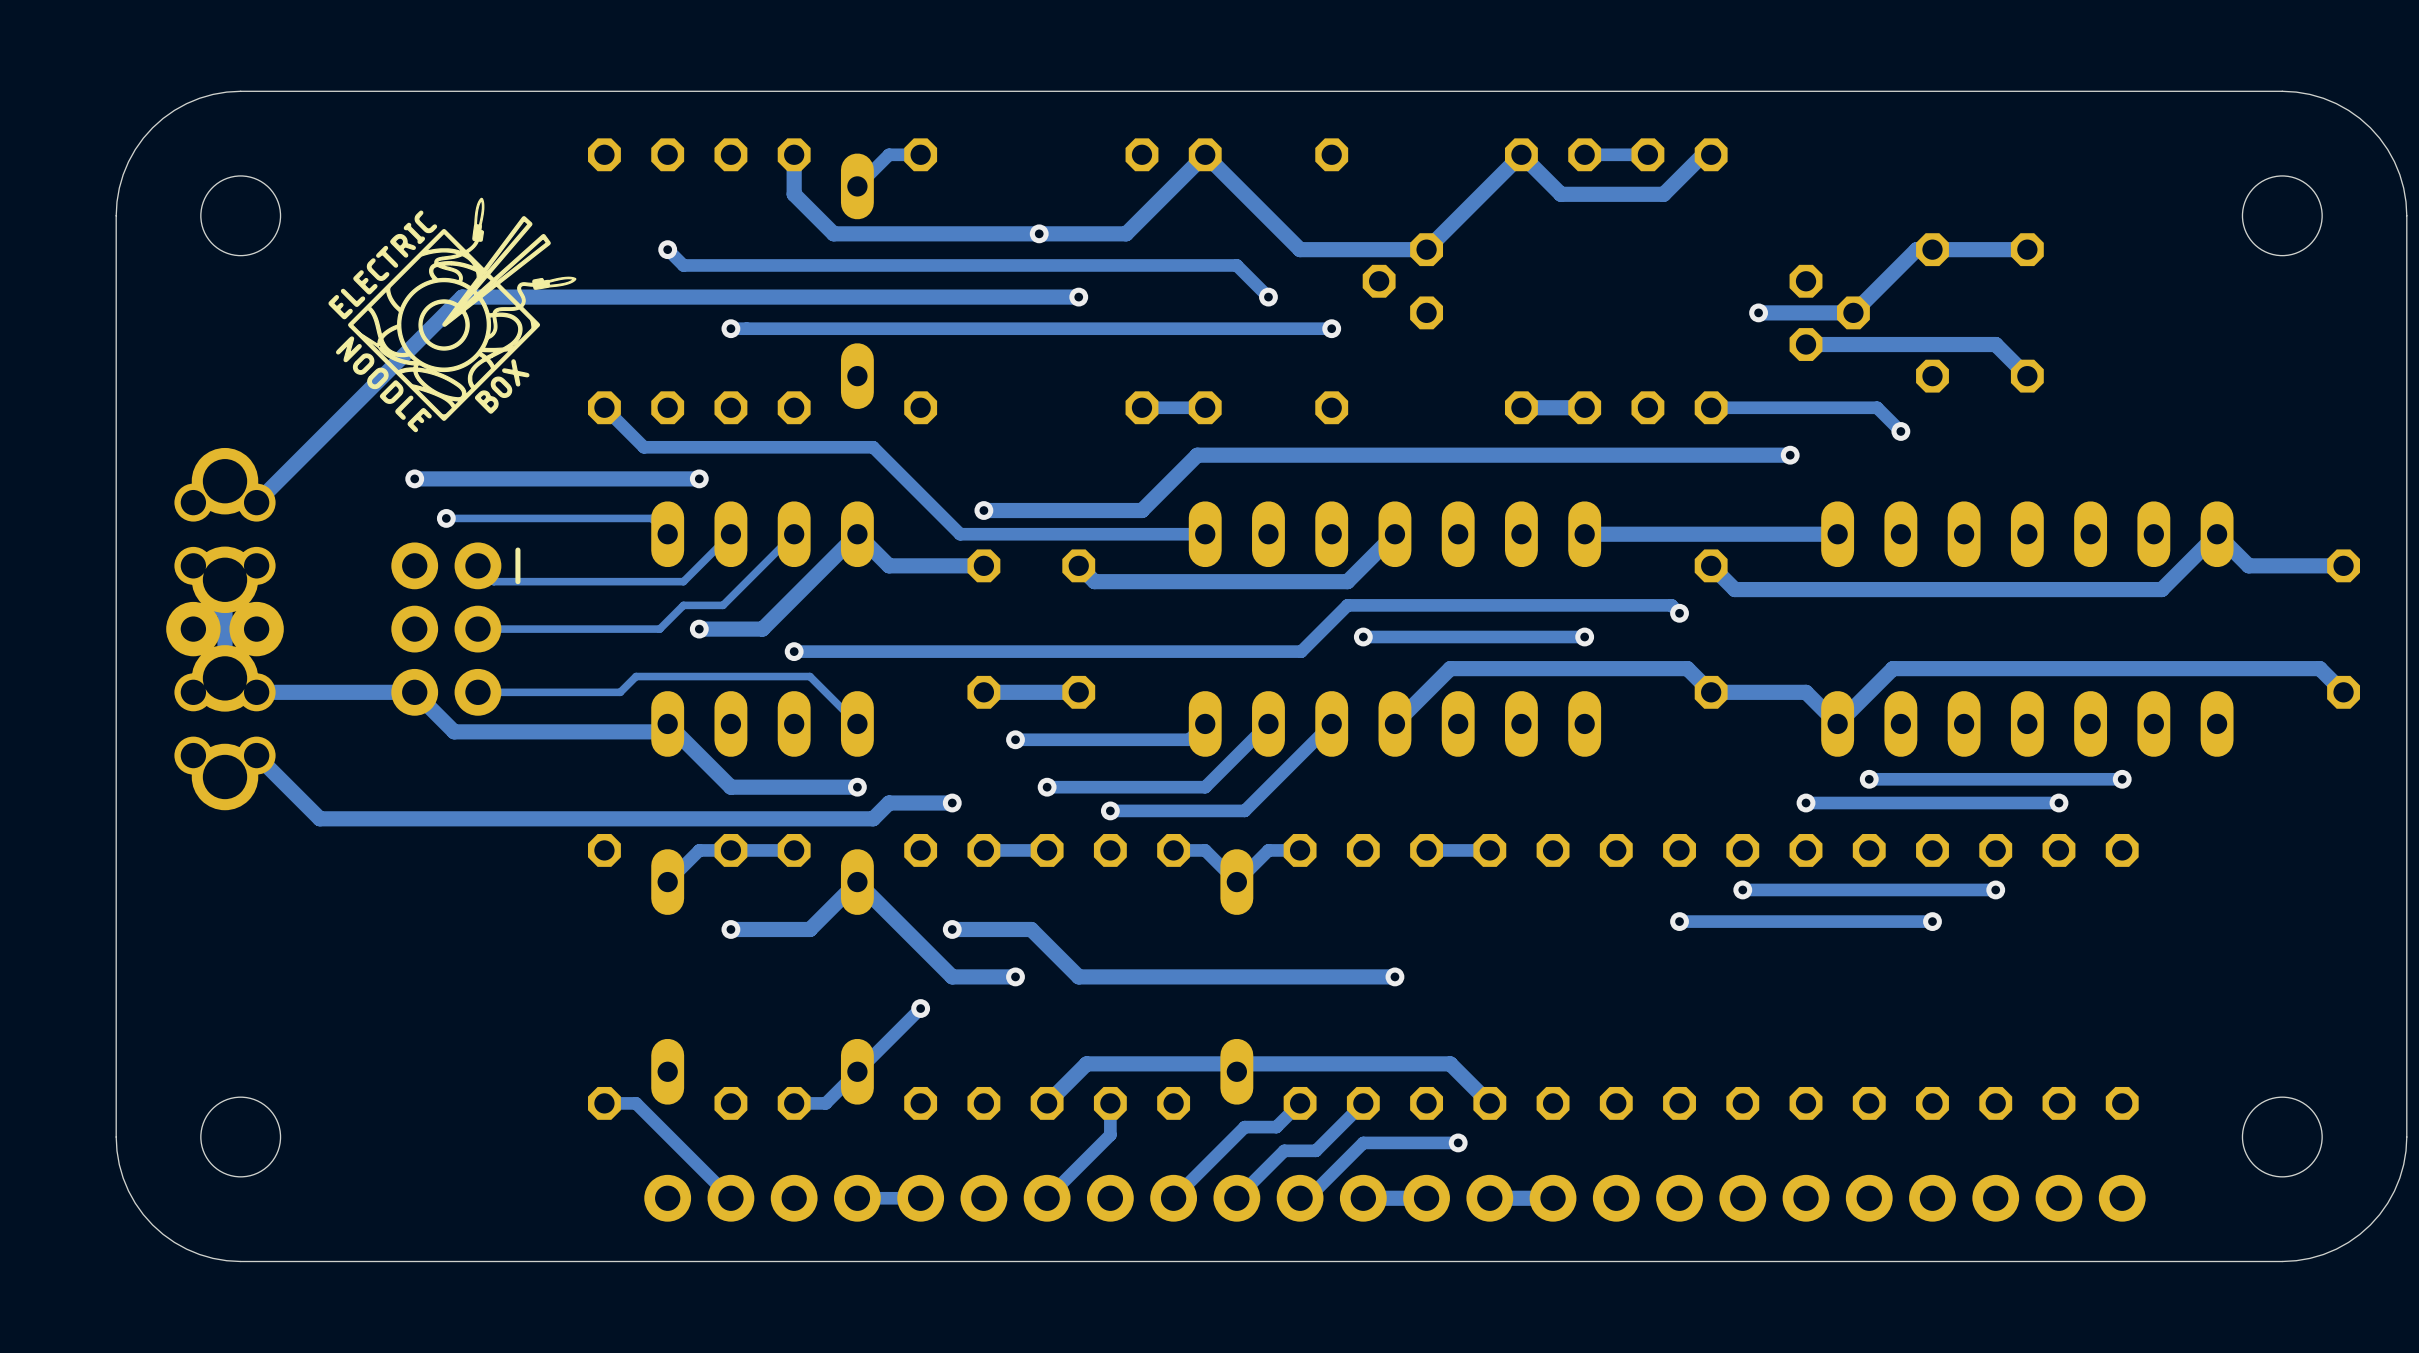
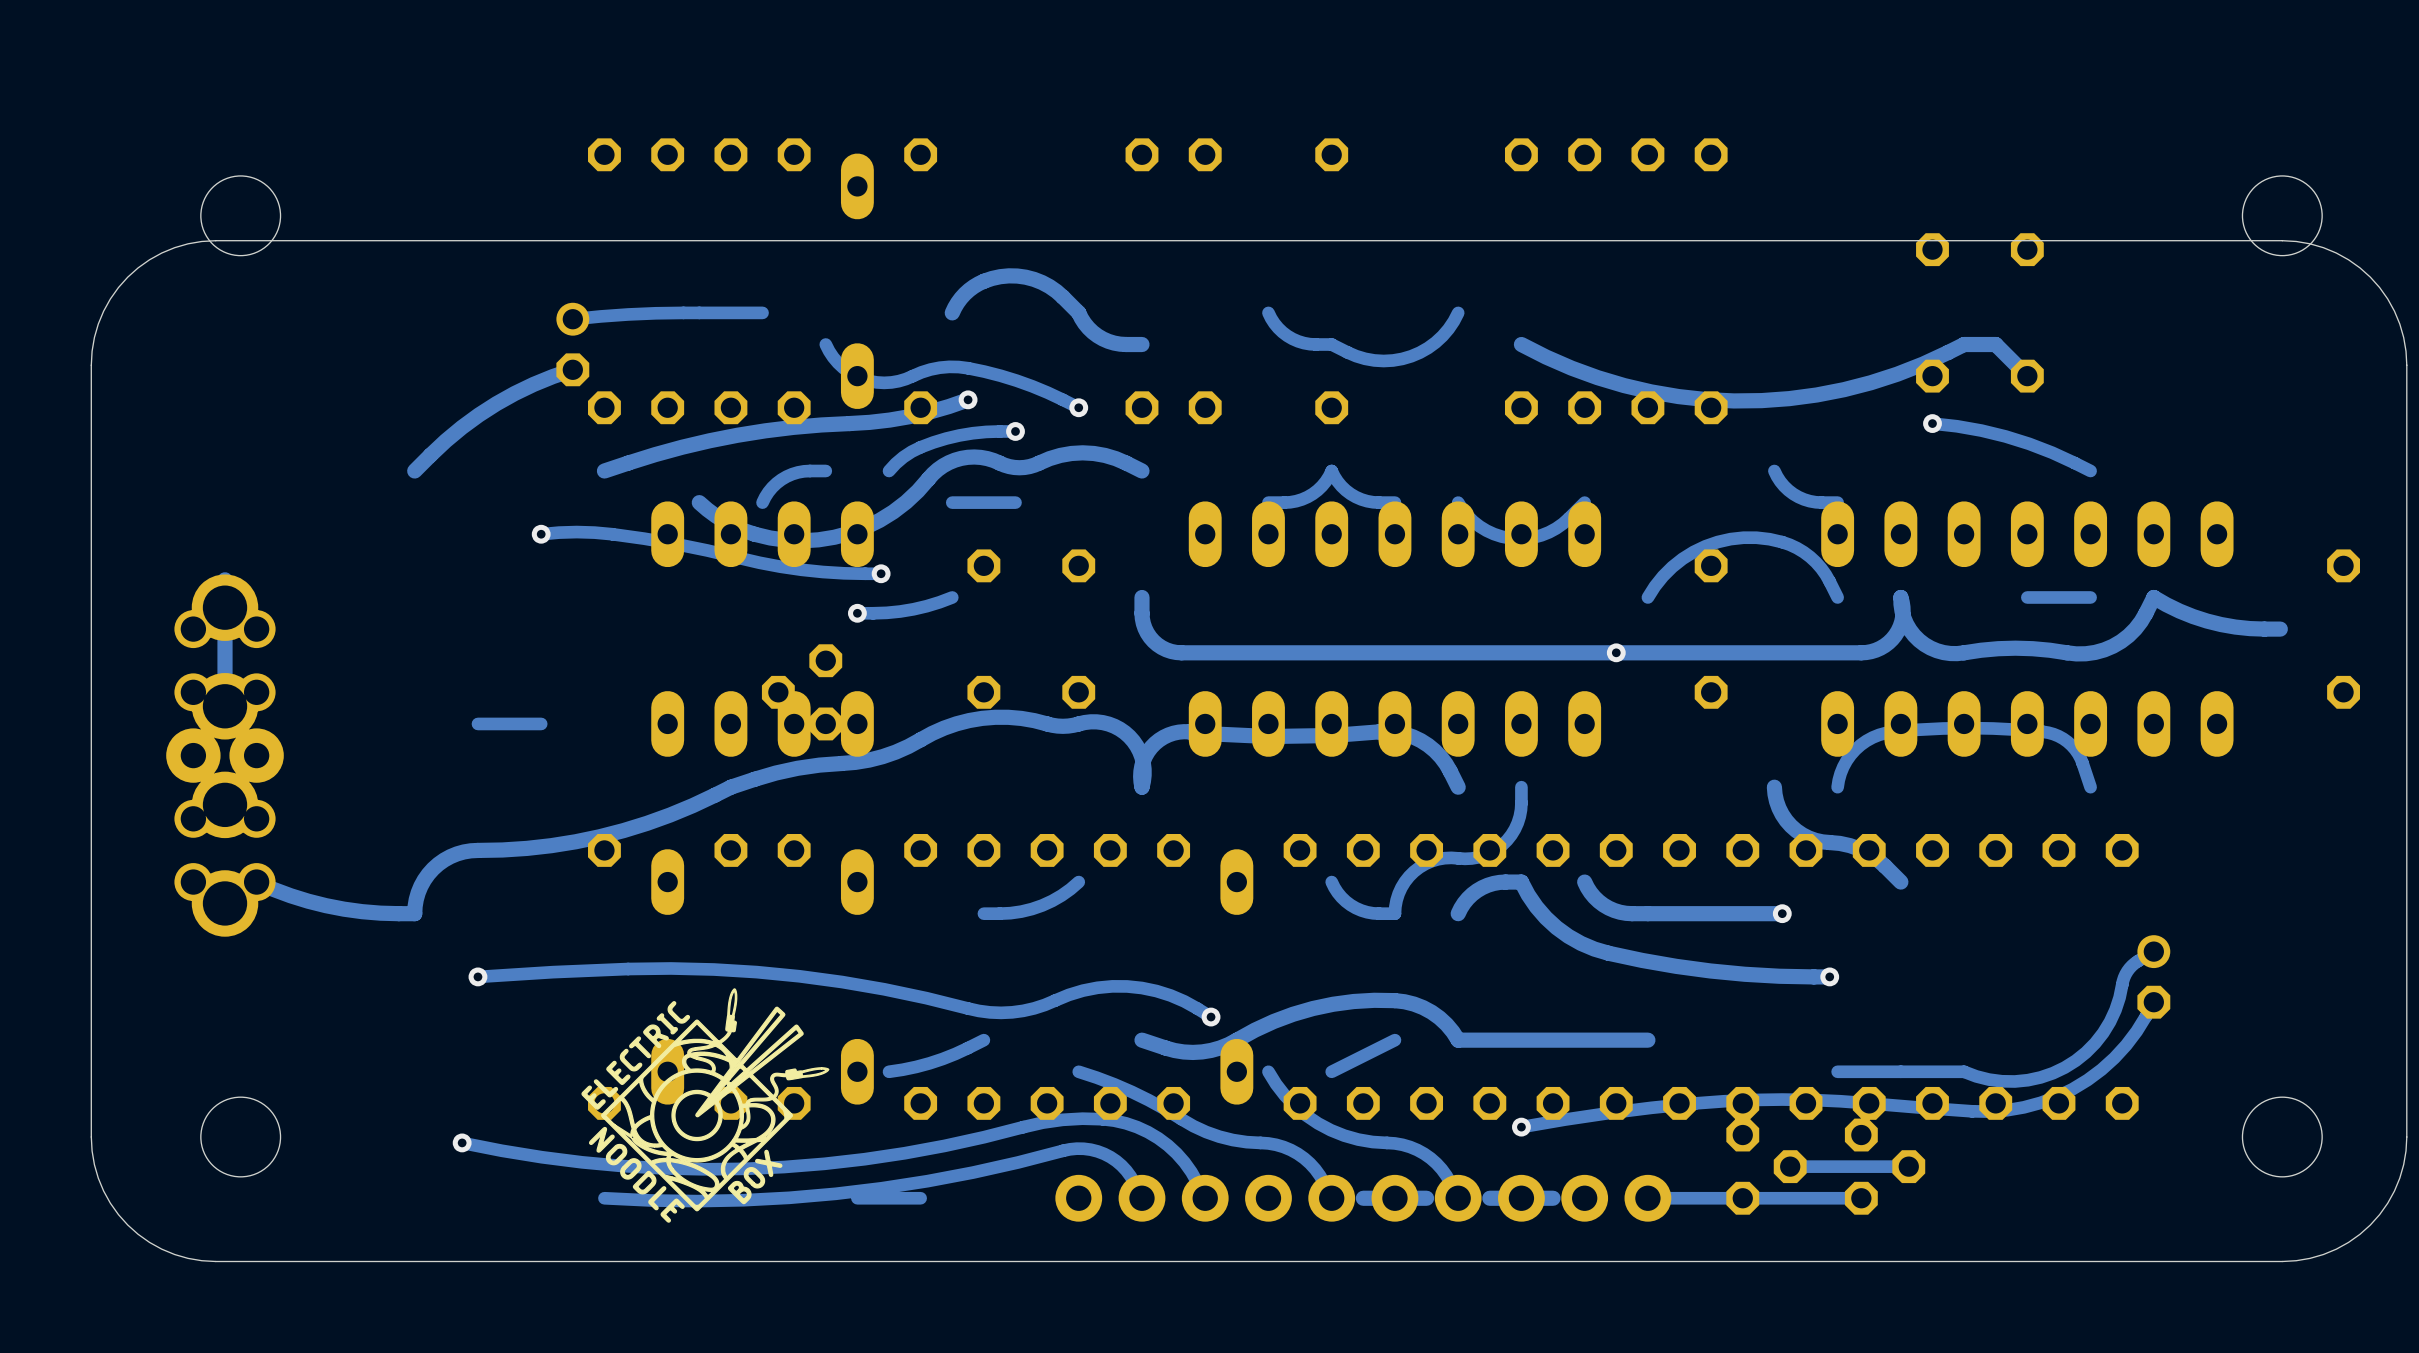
track: (920, 154) (889, 154) (857, 186) -> none
track: (1647, 154) (1584, 154) -> none
track: (1711, 154) (1703, 154) (1663, 194) (1560, 194) (1521, 154) (1426, 249) (1300, 249) (1205, 154) (1126, 233) (833, 233) (794, 194) (794, 154) -> none
drawing: [328, 197, 577, 433] -> none
via: (1039, 233) -> none
track: (667, 249) (683, 265) (1236, 265) (1268, 297) -> none
via: (667, 249) -> none
track: (2027, 249) (1916, 249) (1853, 312) (1758, 312) -> none
part: (1402, 281) -> none
track: (1078, 297) (462, 297) (256, 502) (235, 481) (225, 481) (203, 502) (193, 502) -> none
via: (1078, 297) -> none
via: (1268, 297) -> none
track: none -> (762, 312) (655, 313) (572, 319)
track: none -> (952, 312) (961, 298) (978, 283) (1000, 276) (1025, 277) (1042, 282) (1056, 291) (1078, 312) (1088, 328) (1102, 338) (1120, 344) (1141, 344)
track: none -> (1458, 312) (1442, 336) (1428, 347) (1411, 356) (1383, 361) (1356, 356) (1331, 344) (1309, 344) (1298, 341) (1278, 328) (1268, 312)
via: (1758, 312) -> none
part: (1829, 312) -> none
via: (730, 328) -> none
track: (1331, 328) (730, 328) -> none
via: (1331, 328) -> none
part: none -> (572, 344)
track: none -> (825, 344) (833, 357) (843, 368) (855, 376) (869, 381) (884, 382) (898, 381) (939, 367) (968, 368) (1016, 380) (1078, 407)
track: (1964, 344) (1806, 344) -> (1964, 344) (1897, 374) (1844, 389) (1789, 398) (1733, 400) (1678, 396) (1624, 385) (1571, 368) (1521, 344)
board edge: (2406, 365) (2406, 215) (2406, 201) (2399, 174) (2387, 149) (2379, 138) (2359, 118) (2348, 110) (2323, 98) (2296, 92) (240, 91) (226, 92) (199, 98) (174, 110) (163, 118) (143, 138) (135, 149) (123, 174) (116, 201) (116, 1137) (116, 1150) (123, 1178) (135, 1203) (152, 1225) (174, 1242) (199, 1254) (226, 1260) (240, 1261) -> (2406, 365) (2406, 351) (2399, 324) (2387, 298) (2370, 277) (2348, 259) (2323, 247) (2296, 241) (2282, 240) (215, 240) (201, 241) (174, 247) (149, 259) (138, 267) (118, 287) (110, 298) (98, 324) (92, 351) (92, 1150) (98, 1178) (110, 1203) (118, 1214) (138, 1234) (161, 1249) (188, 1258) (201, 1260) (240, 1261)
track: none -> (572, 369) (533, 384) (496, 403) (461, 427) (414, 470)
track: none -> (968, 399) (929, 412) (889, 420) (793, 427) (737, 435) (682, 447) (604, 470)
via: none -> (968, 399)
track: (604, 407) (643, 447) (873, 447) (960, 534) (1205, 534) -> none
via: none -> (1078, 407)
track: (1205, 407) (1141, 407) -> (1015, 502) (952, 502)
track: (1584, 407) (1521, 407) -> (2090, 597) (2027, 597)
track: (1711, 407) (1877, 407) (1900, 431) -> none
track: none -> (1932, 423) (1957, 426) (2005, 436) (2052, 452) (2090, 470)
track: none -> (1015, 431) (972, 433) (933, 442) (911, 451) (889, 470)
via: none -> (1015, 431)
via position: (1900, 431) -> (1932, 423)
track: (1790, 455) (1197, 455) (1141, 510) (983, 510) -> none
via: (1790, 455) -> none
track: none -> (825, 470) (803, 471) (786, 476) (772, 487) (762, 502)
track: none -> (1141, 470) (1115, 458) (1093, 453) (1060, 455) (1034, 465) (1019, 467) (980, 457) (961, 458) (937, 469) (906, 502) (879, 520) (850, 533) (818, 539) (786, 540) (754, 534) (725, 521) (699, 502)
track: none -> (1774, 470) (1784, 486) (1798, 497) (1815, 502) (1837, 502)
via: (414, 478) -> none
track: (699, 478) (414, 478) -> none
via: (699, 478) -> none
track: none -> (1394, 502) (1373, 502) (1355, 497) (1341, 486) (1331, 470) (1321, 486) (1307, 497) (1290, 502) (1268, 502)
track: none -> (1584, 502) (1556, 528) (1533, 537) (1517, 538) (1501, 536) (1486, 530) (1473, 521) (1458, 502)
via: (983, 510) -> none
track: (446, 518) (651, 518) (667, 534) -> none
via: (446, 518) -> none
track: none -> (541, 534) (576, 532) (612, 534) (675, 544) (780, 566) (822, 571) (881, 573)
via: none -> (541, 534)
track: (730, 534) (683, 581) (493, 581) (477, 565) -> none
track: (794, 534) (723, 605) (683, 605) (659, 629) (477, 629) -> none
track: (1394, 534) (1347, 581) (1094, 581) (1078, 565) -> none
track: (1837, 534) (1584, 534) -> none
track: (983, 565) (889, 565) (857, 534) (762, 629) (699, 629) -> none
track: (2343, 565) (2248, 565) (2217, 534) (2161, 589) (1734, 589) (1711, 565) -> none
via: none -> (881, 573)
track: none -> (952, 597) (913, 609) (886, 612) (857, 613)
track: none -> (1141, 597) (1143, 623) (1150, 637) (1166, 649) (1181, 652) (1866, 652) (1884, 645) (1897, 631) (1902, 617) (1903, 612) (1902, 607) (1900, 597) (1902, 611) (1903, 617) (1914, 635) (1930, 648) (1950, 653) (2015, 648) (2076, 653) (2095, 652) (2112, 646) (2128, 635) (2141, 621) (2153, 597) (2179, 611) (2206, 621) (2235, 627) (2280, 629)
track: none -> (1837, 597) (1821, 568) (1803, 552) (1782, 542) (1743, 537) (1717, 542) (1682, 558) (1663, 576) (1647, 597)
via: none -> (857, 613)
track: (1679, 613) (1671, 605) (1347, 605) (1301, 651) (794, 651) -> none
via: (1679, 613) -> none
part position: (225, 629) -> (225, 755)
part: (455, 629) -> none
via: (699, 629) -> none
via: (1363, 637) -> none
track: (1584, 637) (1363, 637) -> none
via position: (1584, 637) -> (1616, 652)
via: (794, 651) -> none
track: (193, 692) (207, 678) (225, 678) (238, 692) (414, 692) (454, 731) (659, 731) (667, 723) (730, 787) (857, 787) -> none
track: (477, 692) (620, 692) (636, 676) (809, 676) (857, 723) -> none
part: none -> (802, 692)
track: (1078, 692) (983, 692) -> none
track: (2343, 692) (2319, 668) (1892, 668) (1837, 723) (1806, 692) (1711, 692) (1687, 668) (1450, 668) (1394, 723) -> none
track: (1205, 723) (1189, 739) (1015, 739) -> none
track: (1268, 723) (1205, 787) (1047, 787) -> none
track: (1331, 723) (1244, 810) (1110, 810) -> none
via: (1015, 739) -> none
track: (193, 755) (203, 755) (225, 776) (246, 755) (256, 755) (319, 818) (873, 818) (889, 803) (952, 803) -> none
via: (1869, 779) -> none
track: (2122, 779) (1869, 779) -> none
via: (2122, 779) -> none
via: (857, 787) -> none
via: (1047, 787) -> none
track: none -> (1458, 787) (1445, 763) (1428, 745) (1404, 734) (1387, 731) (1284, 736) (1184, 731) (1173, 733) (1159, 740) (1148, 751) (1143, 760) (1141, 766) (1140, 771) (1141, 787) (1144, 769) (1143, 763) (1141, 757) (1139, 751) (1129, 736) (1114, 726) (1090, 721) (1057, 726) (1021, 718) (995, 717) (969, 720) (944, 728) (908, 746) (882, 756) (855, 762) (797, 768) (754, 779) (730, 787) (670, 814) (599, 836) (551, 845) (470, 850) (457, 853) (444, 860) (428, 874) (418, 892) (414, 913) (362, 911) (326, 905) (290, 895) (256, 882) (225, 903) (193, 882)
track: none -> (1521, 787) (1519, 816) (1514, 829) (1507, 840) (1496, 849) (1484, 855) (1471, 858) (1437, 859) (1419, 867) (1409, 876) (1401, 887) (1396, 900) (1394, 913) (1373, 913) (1355, 908) (1341, 897) (1331, 882)
track: none -> (1774, 787) (1776, 801) (1782, 814) (1796, 830) (1815, 840) (1839, 843) (1859, 849) (1877, 859) (1900, 882)
track: none -> (2090, 787) (2078, 753) (2071, 745) (2058, 736) (2043, 731) (1968, 728) (1892, 731) (1872, 737) (1860, 744) (1850, 754) (1840, 773) (1837, 787)
via: (952, 803) -> none
via: (1806, 803) -> none
track: (2058, 803) (1806, 803) -> none
via: (2058, 803) -> none
via: (1110, 810) -> none
track: (794, 850) (699, 850) (667, 882) -> none
track: (1047, 850) (983, 850) -> (541, 723) (477, 723)
track: (1300, 850) (1268, 850) (1236, 882) (1205, 850) (1173, 850) -> none
track: (1489, 850) (1426, 850) -> none
track: none -> (1078, 882) (1052, 900) (1031, 909) (1010, 913) (983, 913)
track: none -> (1584, 882) (1590, 892) (1603, 905) (1626, 913) (1782, 913)
via position: (1742, 889) -> (1782, 913)
track: (1995, 889) (1742, 889) -> none
via: (1995, 889) -> none
track: none -> (1458, 913) (1467, 898) (1482, 887) (1499, 882) (1521, 882) (1536, 906) (1556, 927) (1581, 943) (1594, 949) (1642, 960) (1710, 970) (1779, 976) (1829, 976)
via: (1679, 921) -> none
track: (1932, 921) (1679, 921) -> none
via: (1932, 921) -> none
track: (730, 929) (809, 929) (857, 882) (952, 976) (1015, 976) -> none
via: (730, 929) -> none
track: (952, 929) (1031, 929) (1078, 976) (1394, 976) -> none
via: (952, 929) -> none
track: none -> (2153, 951) (2134, 963) (2127, 971) (2115, 1009) (2110, 1021) (2095, 1043) (2075, 1060) (2053, 1073) (2040, 1077) (2014, 1081) (1988, 1079) (1964, 1071) (1837, 1071)
track: none -> (477, 976) (628, 969) (671, 968) (756, 972) (842, 982) (926, 998) (978, 1010) (1001, 1012) (1034, 1008) (1082, 990) (1127, 986) (1170, 995) (1211, 1017)
via: none -> (477, 976)
via: (1015, 976) -> none
via: (1394, 976) -> none
via: none -> (1829, 976)
part: none -> (2153, 976)
drawing: none -> [581, 988, 830, 1223]
track: none -> (2153, 1002) (2126, 1045) (2101, 1069) (2087, 1080) (2057, 1096) (2023, 1107) (2006, 1110) (1972, 1111) (1840, 1101) (1753, 1099) (1651, 1107) (1521, 1127)
track: (920, 1008) (825, 1103) (794, 1103) -> none
via: (920, 1008) -> none
via: none -> (1211, 1017)
track: none -> (983, 1040) (942, 1058) (916, 1066) (889, 1071)
track: none -> (1394, 1040) (1331, 1071)
track: none -> (1647, 1040) (1458, 1040) (1439, 1017) (1423, 1007) (1404, 1001) (1374, 1000) (1333, 1004) (1293, 1014) (1254, 1030) (1228, 1044) (1211, 1050) (1183, 1051) (1141, 1040)
track: none -> (1078, 1071) (1131, 1091) (1206, 1132) (1232, 1140) (1268, 1143) (1290, 1150) (1304, 1158) (1315, 1169) (1331, 1198)
track: none -> (1268, 1071) (1284, 1095) (1294, 1106) (1318, 1123) (1330, 1130) (1358, 1139) (1402, 1144) (1424, 1153) (1441, 1169) (1458, 1198)
track: (604, 1103) (636, 1103) (730, 1198) -> none
track: (1110, 1103) (1110, 1135) (1047, 1198) -> none
track: (1300, 1103) (1276, 1127) (1244, 1127) (1173, 1198) -> none
track: (1363, 1103) (1315, 1150) (1284, 1150) (1236, 1198) -> none
track: (1489, 1103) (1450, 1063) (1244, 1063) (1236, 1071) (1228, 1063) (1086, 1063) (1047, 1103) -> none
track: none -> (462, 1142) (541, 1157) (622, 1166) (743, 1168) (864, 1159) (944, 1145) (1042, 1122) (1082, 1118) (1102, 1119) (1137, 1127) (1167, 1145) (1191, 1172) (1205, 1198)
via: none -> (462, 1142)
track: (1458, 1142) (1363, 1142) (1308, 1198) (1300, 1198) -> none
via position: (1458, 1142) -> (1521, 1127)
part: none -> (1766, 1166)
part: none -> (1885, 1166)
track: none -> (1908, 1166) (1790, 1166)
part footprint: [1150, 1174, 1198, 1222] -> [1118, 1174, 1229, 1222]
part footprint: [1213, 1174, 1324, 1222] -> [1245, 1174, 1292, 1222]
part footprint: [1339, 1174, 1450, 1222] -> [1371, 1174, 1419, 1222]
part footprint: [1466, 1174, 1577, 1222] -> [1498, 1174, 1545, 1222]
part footprint: [1592, 1174, 1640, 1222] -> [1561, 1174, 1672, 1222]
part: (667, 1198) -> none
part: (730, 1198) -> none
part: (794, 1198) -> none
part: (857, 1198) -> none
part: (920, 1198) -> none
part: (1047, 1198) -> none
part: none -> (1078, 1198)
track: none -> (1141, 1198) (1130, 1176) (1116, 1161) (1097, 1151) (1076, 1148) (927, 1181) (835, 1193) (743, 1200) (650, 1200) (604, 1198)
part: none -> (1331, 1198)
part: none -> (1458, 1198)
part: (1679, 1198) -> none
part: (1742, 1198) -> none
part: (1806, 1198) -> none
track: none -> (1861, 1198) (1647, 1198)
part: (1869, 1198) -> none
part: (1932, 1198) -> none
part: (1995, 1198) -> none
part: (2058, 1198) -> none
part: (2122, 1198) -> none

